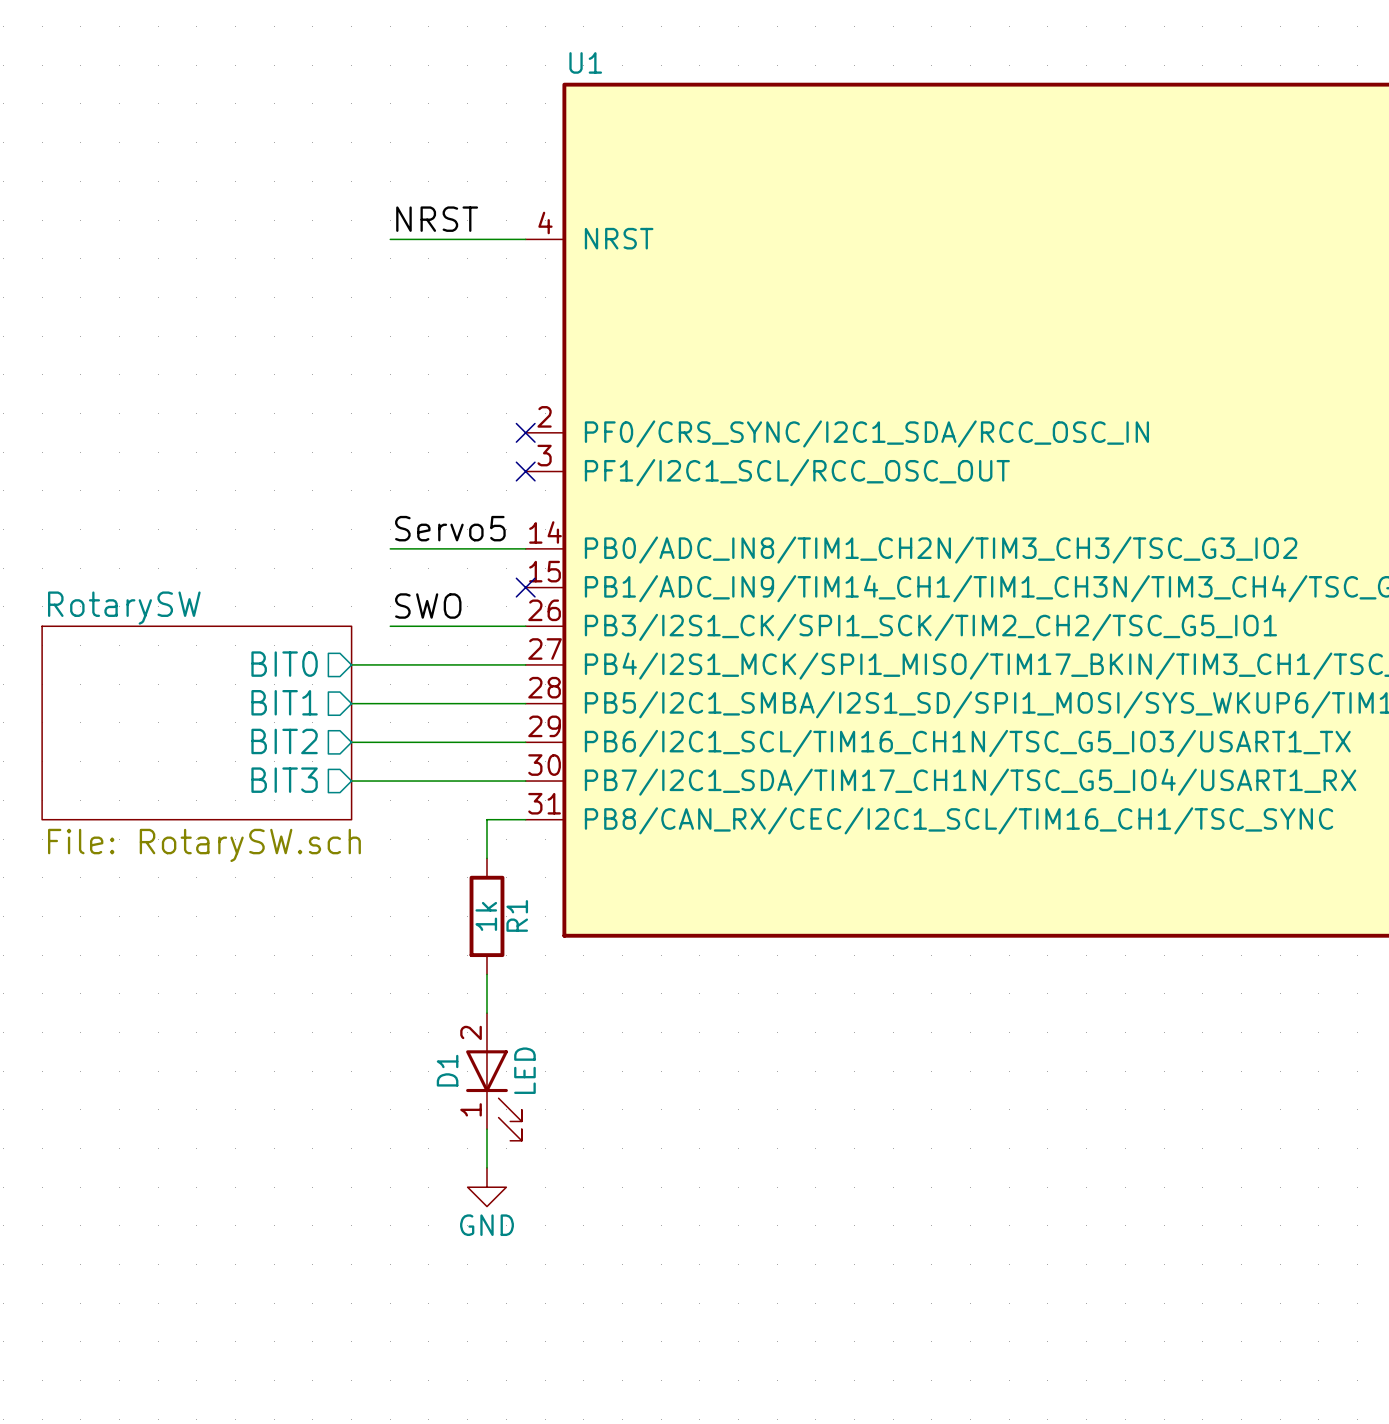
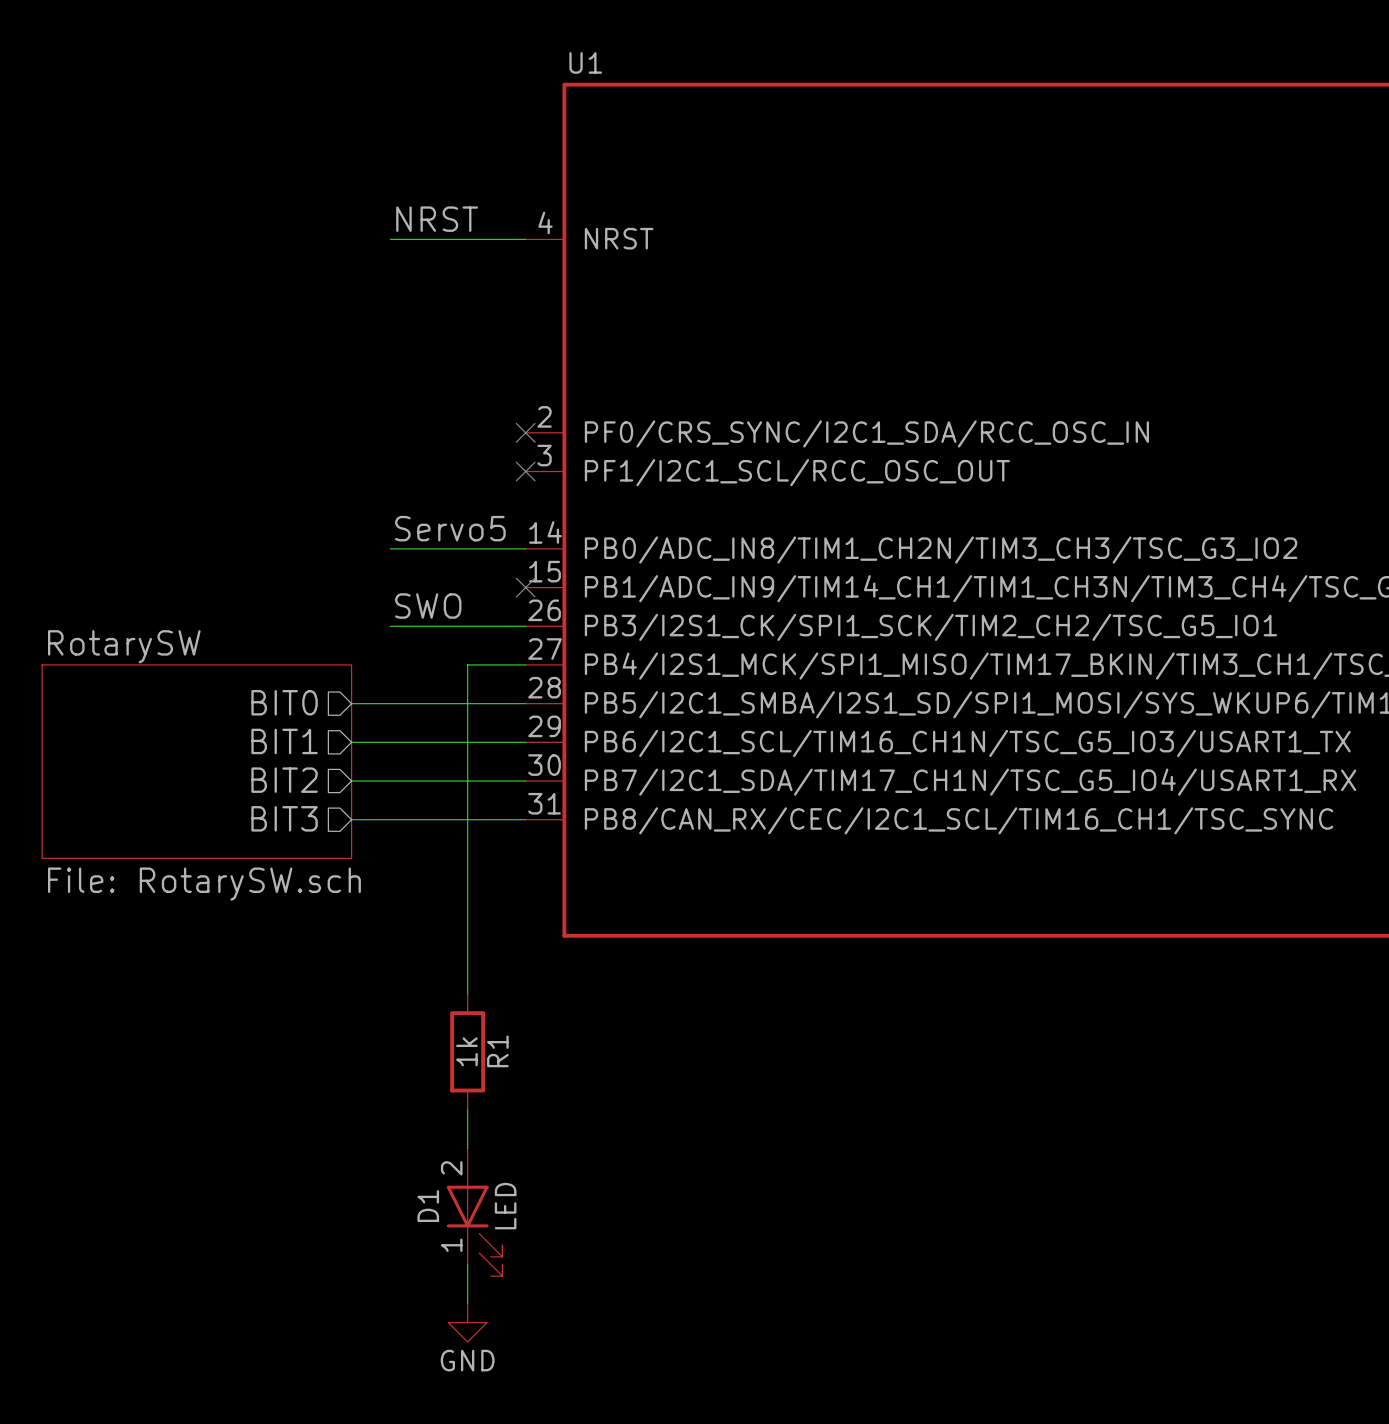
sheet pin: BIT0 (284, 664) -> none
wire: (351, 664) (467, 664) -> (467, 993) (467, 664)
sheet pin: BIT1 (284, 702) -> BIT0 (284, 702)
sheet RotarySW position: (196, 722) -> (196, 761)
sheet pin: BIT2 (284, 741) -> BIT1 (284, 741)
sheet pin: BIT3 (284, 780) -> BIT2 (284, 780)
sheet pin: none -> BIT3 (284, 818)
wire: (486, 819) (486, 858) -> (486, 819) (351, 819)
R1 position: (486, 916) -> (467, 1051)
wire: (486, 974) (486, 1013) -> (467, 1109) (467, 1148)
D1 position: (493, 1076) -> (474, 1212)
wire: (486, 1129) (486, 1167) -> (467, 1264) (467, 1303)
power symbol position: GND (486, 1187) -> GND (467, 1322)

